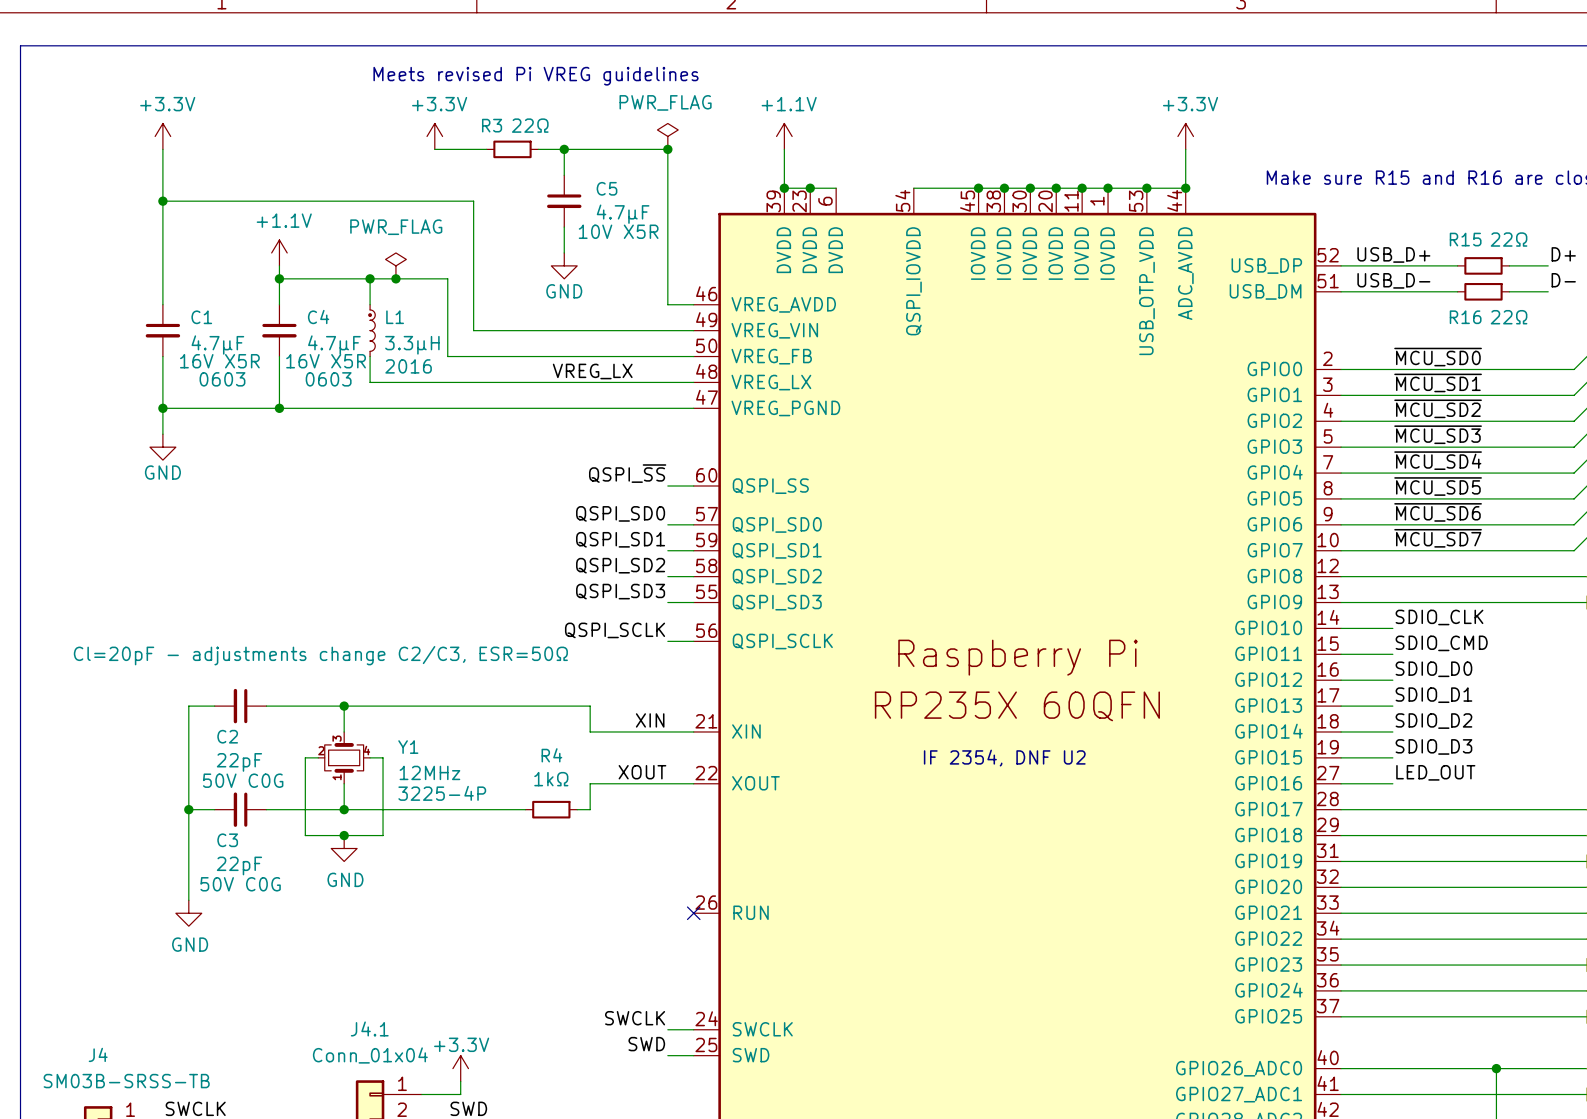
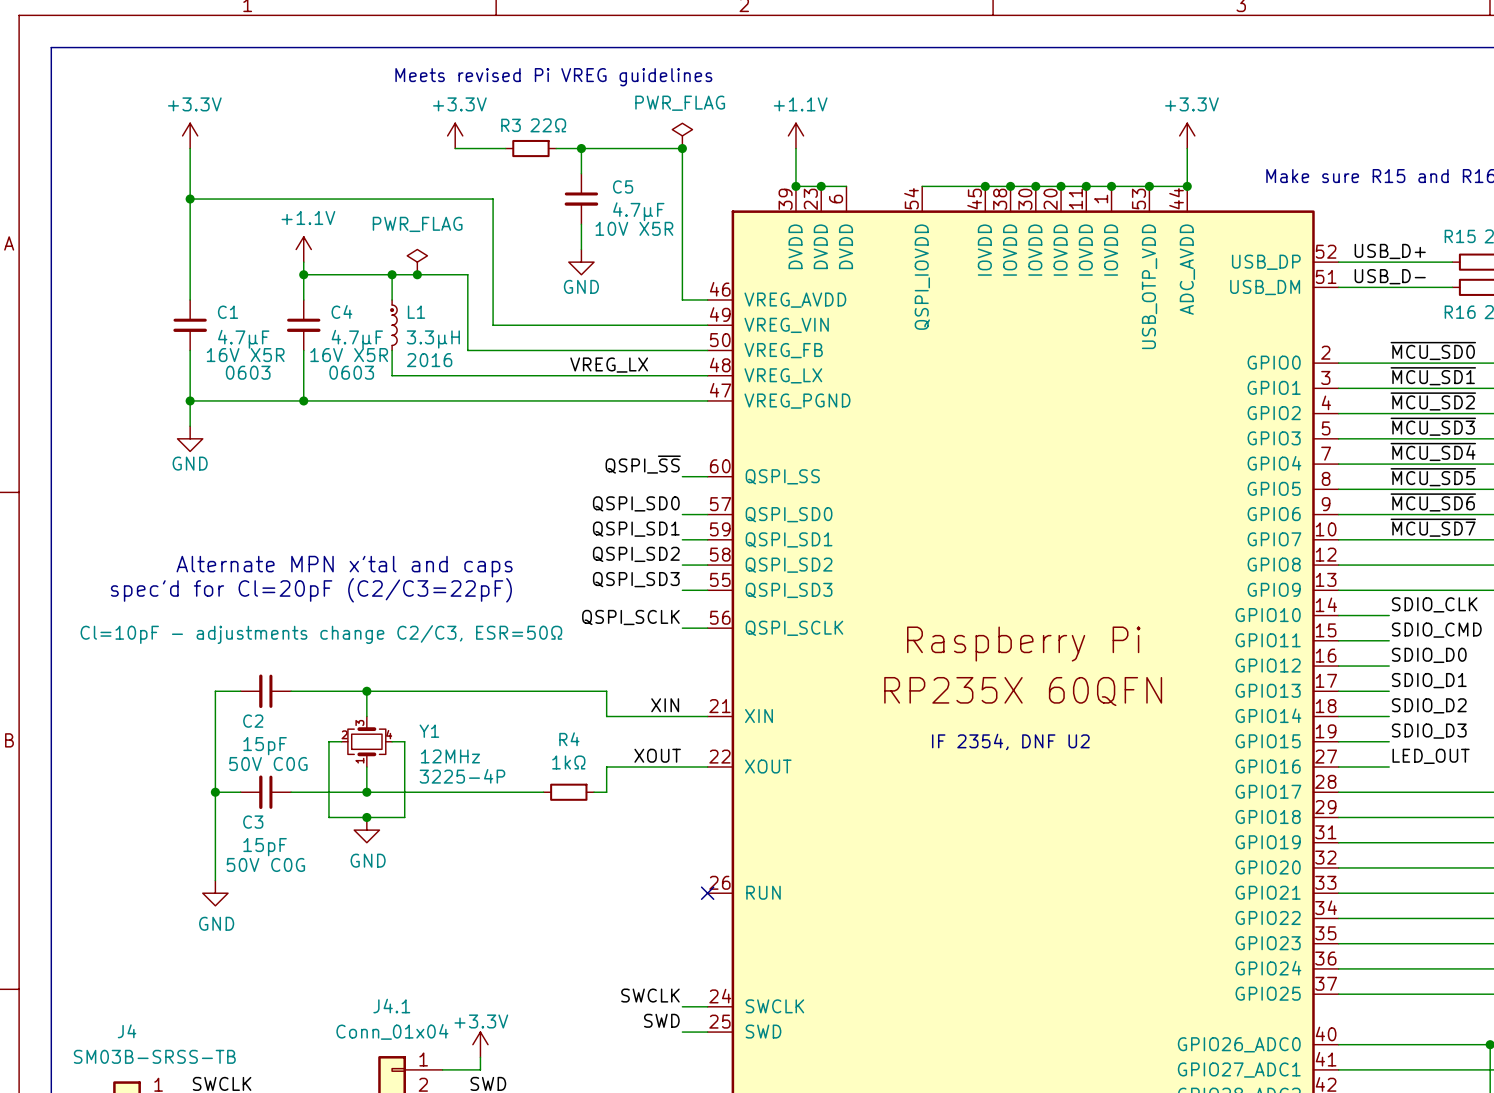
text: none -> Alternate MPN x'tal and caps (344, 566)
text: none -> spec'd for Cl=20pF (C2/C3=22pF) (311, 590)
Y1 text: Cl=20pF - adjustments change C2/C3, ESR=50Ω (320, 655) -> Cl=10pF - adjustments change C2/C3, ESR=50Ω (321, 634)
C2 value: 22pF (239, 762) -> 15pF (265, 746)
C3 value: 22pF (239, 865) -> 15pF (265, 847)

